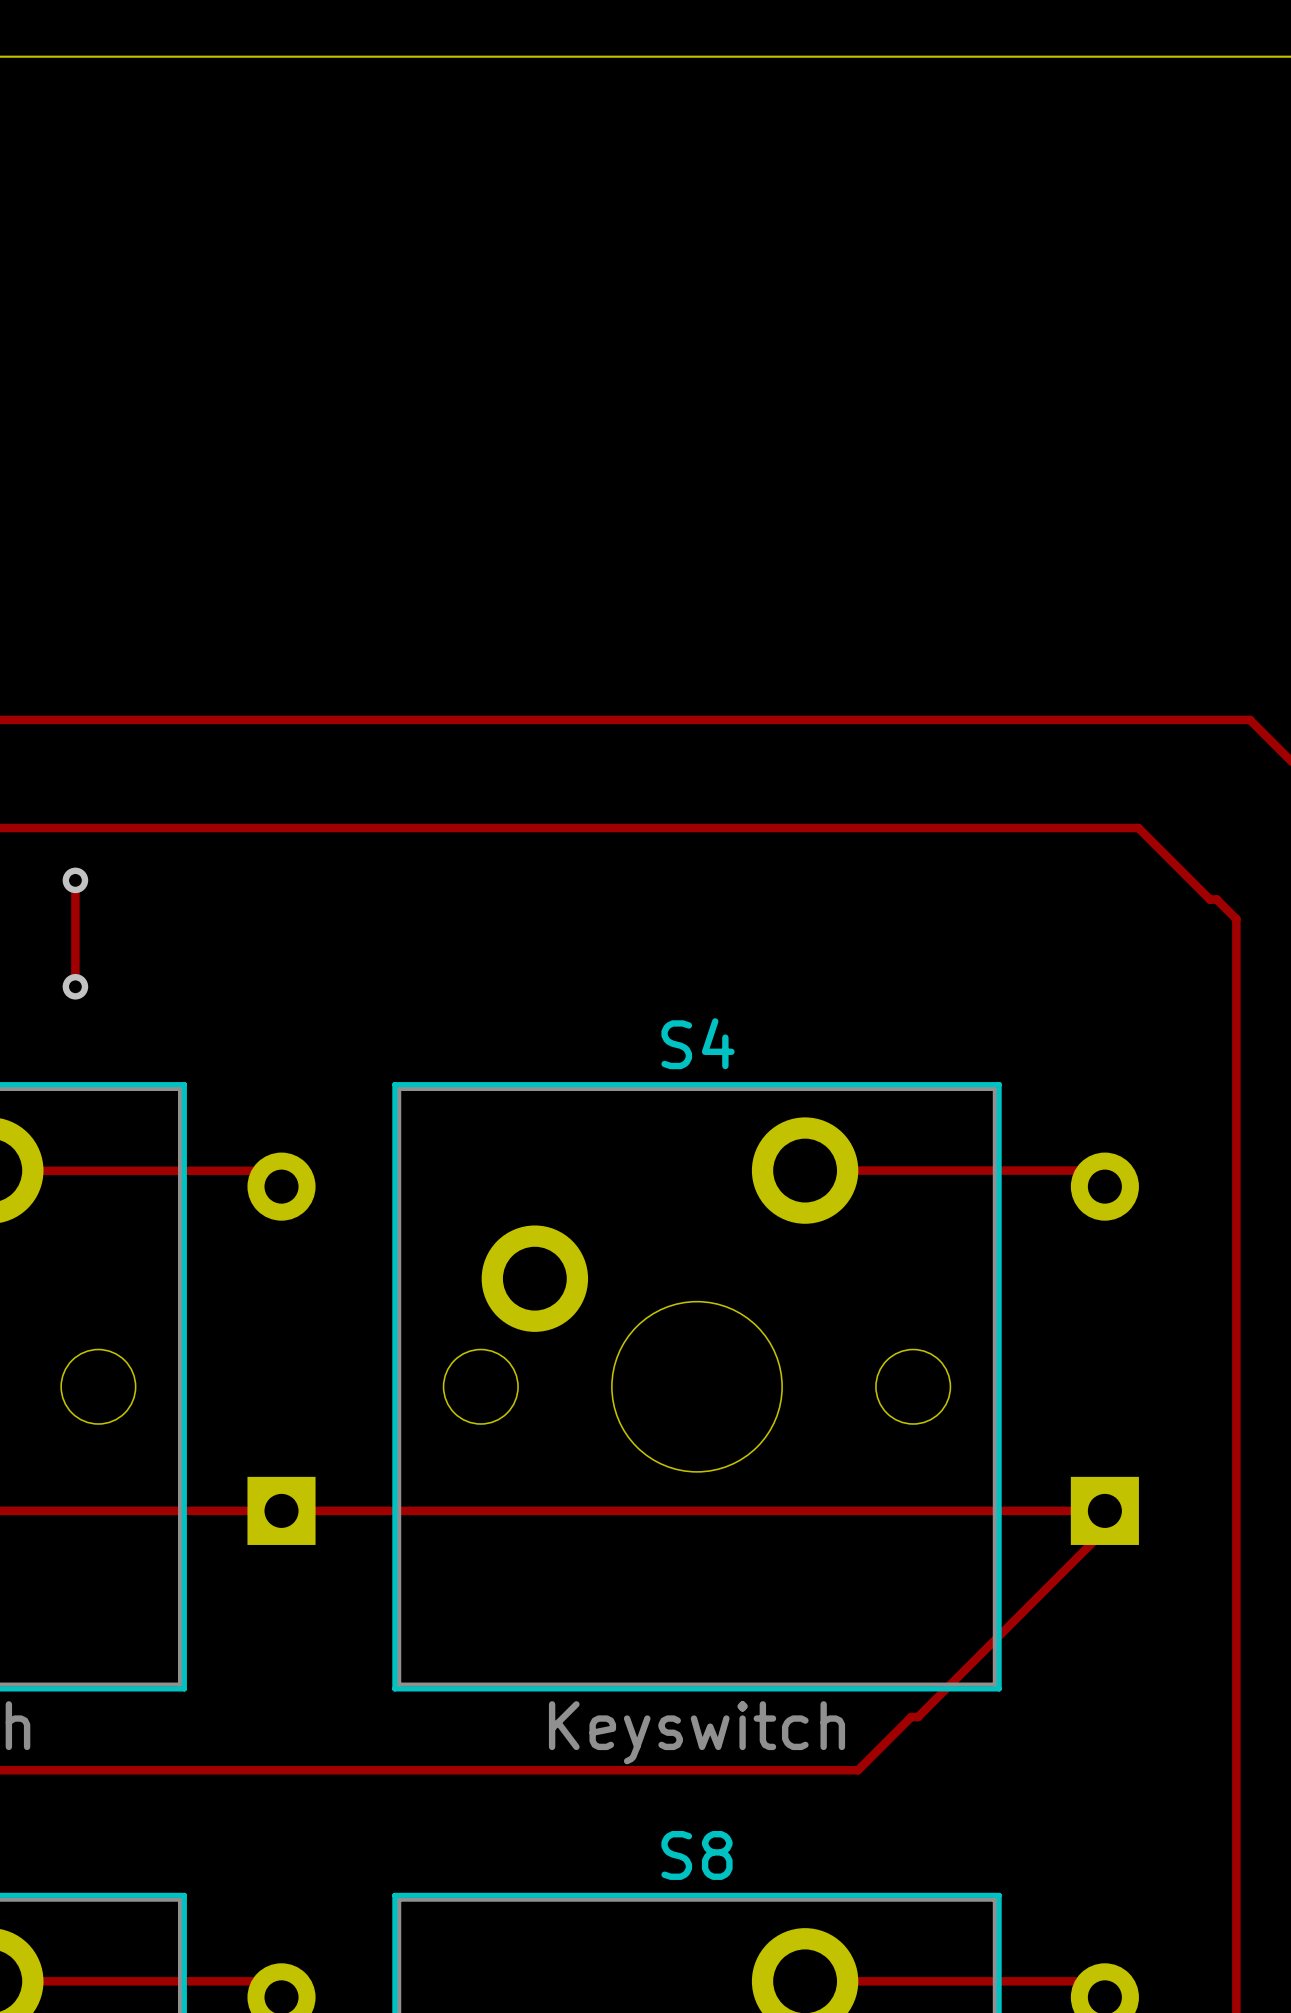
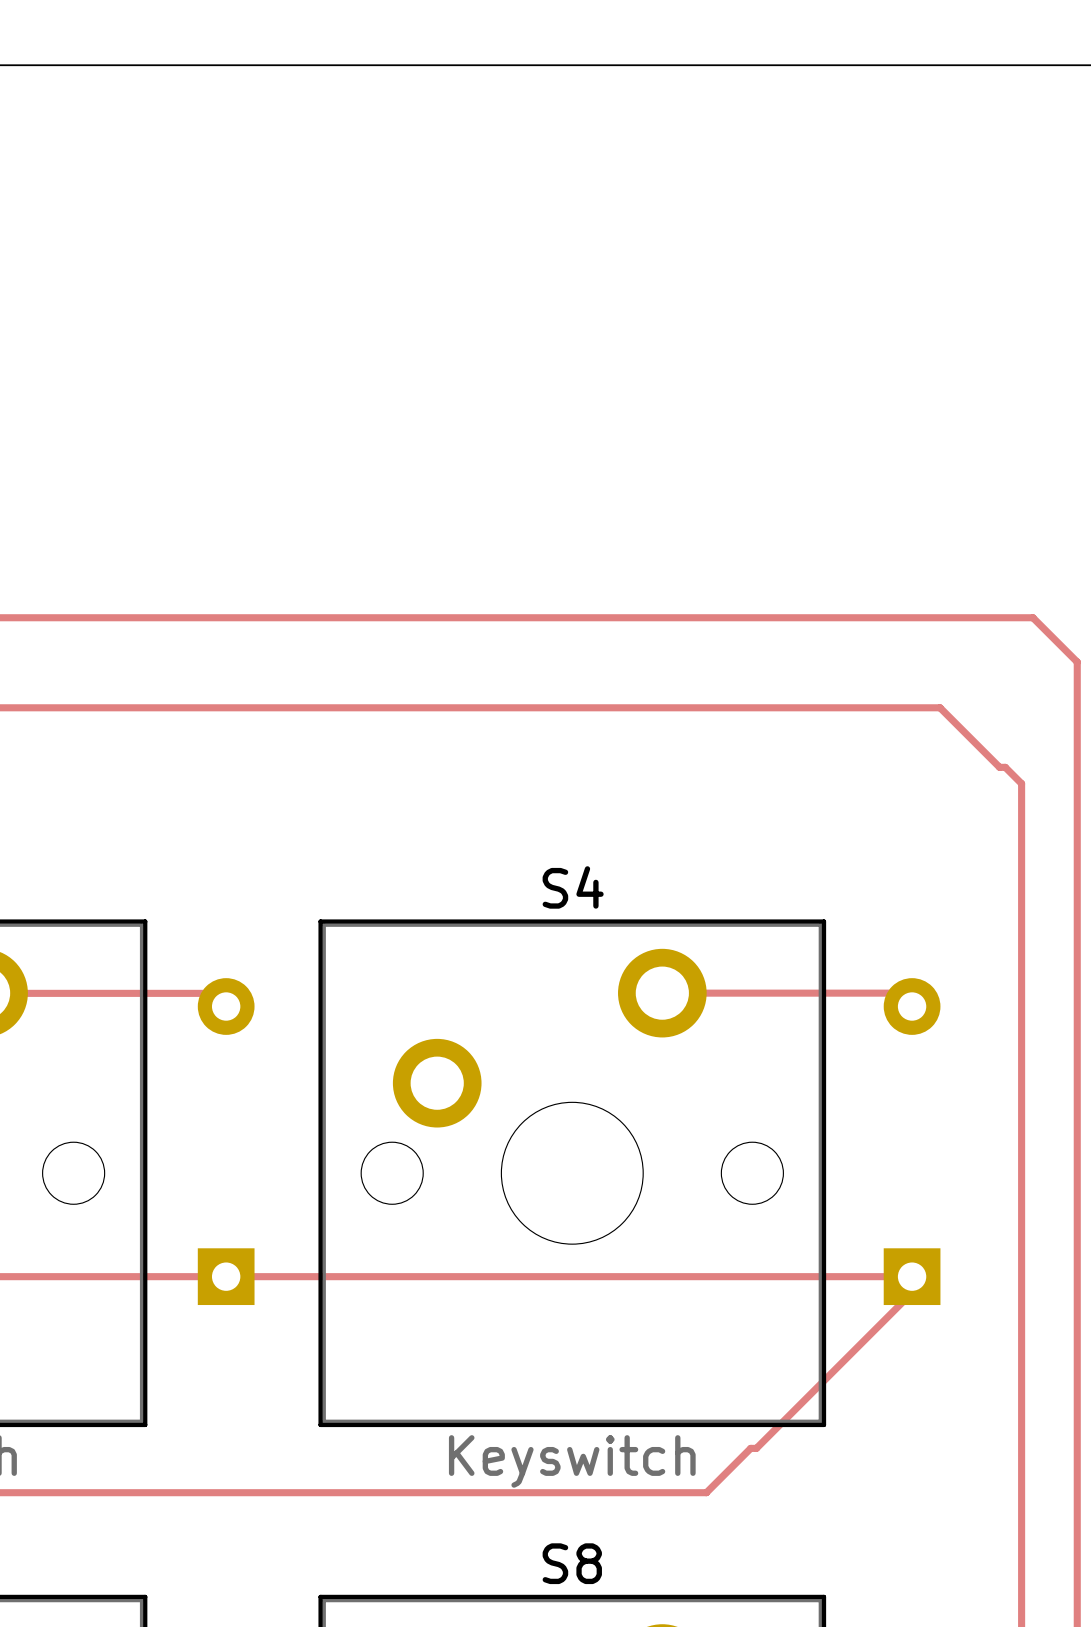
track: (75, 880) (75, 986) -> none
via: (75, 880) -> none
via: (75, 986) -> none

